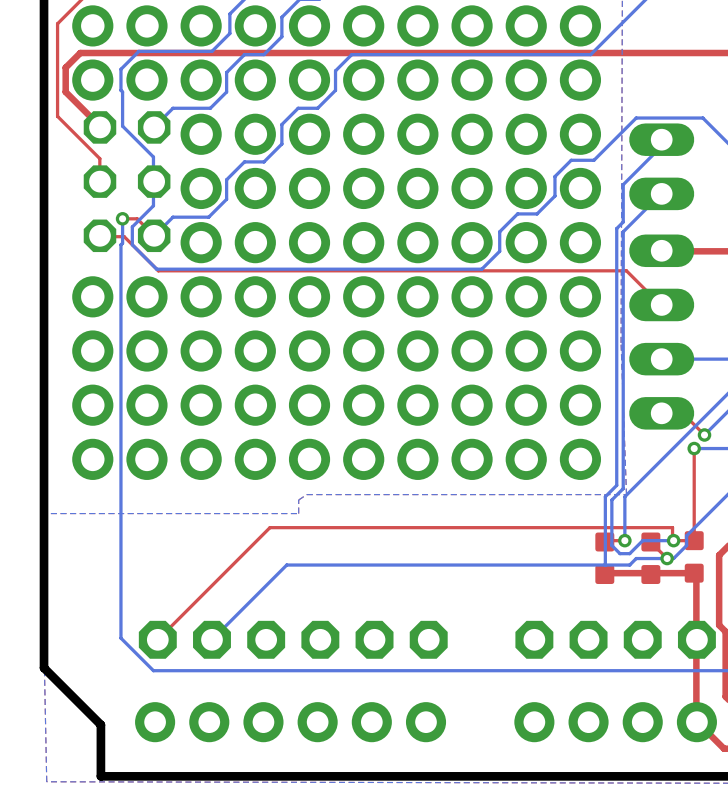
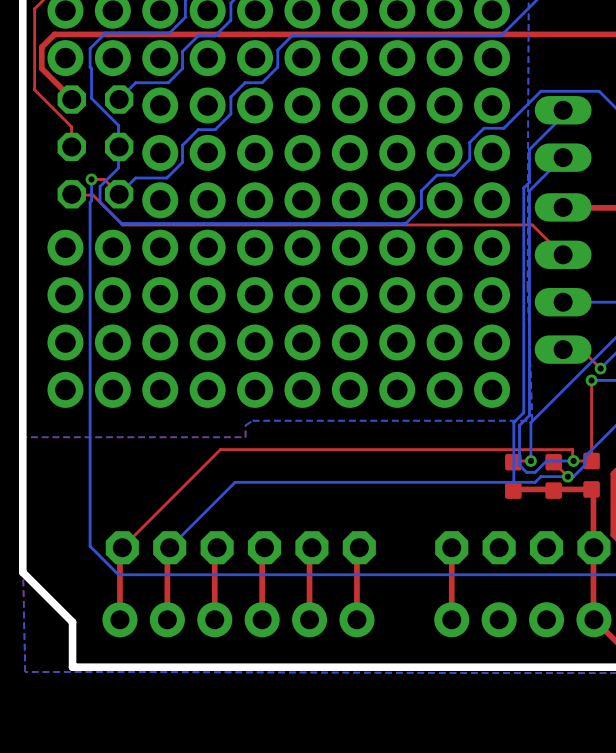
top track: none -> (122, 547) (119, 547) (119, 619)
top track: none -> (169, 547) (167, 547) (167, 619)
top track: none -> (217, 547) (214, 547) (214, 619)
top track: none -> (264, 547) (262, 547) (262, 619)
top track: none -> (311, 547) (309, 547) (309, 619)
top track: none -> (359, 547) (356, 547) (356, 619)
top track: none -> (451, 547) (451, 619)

